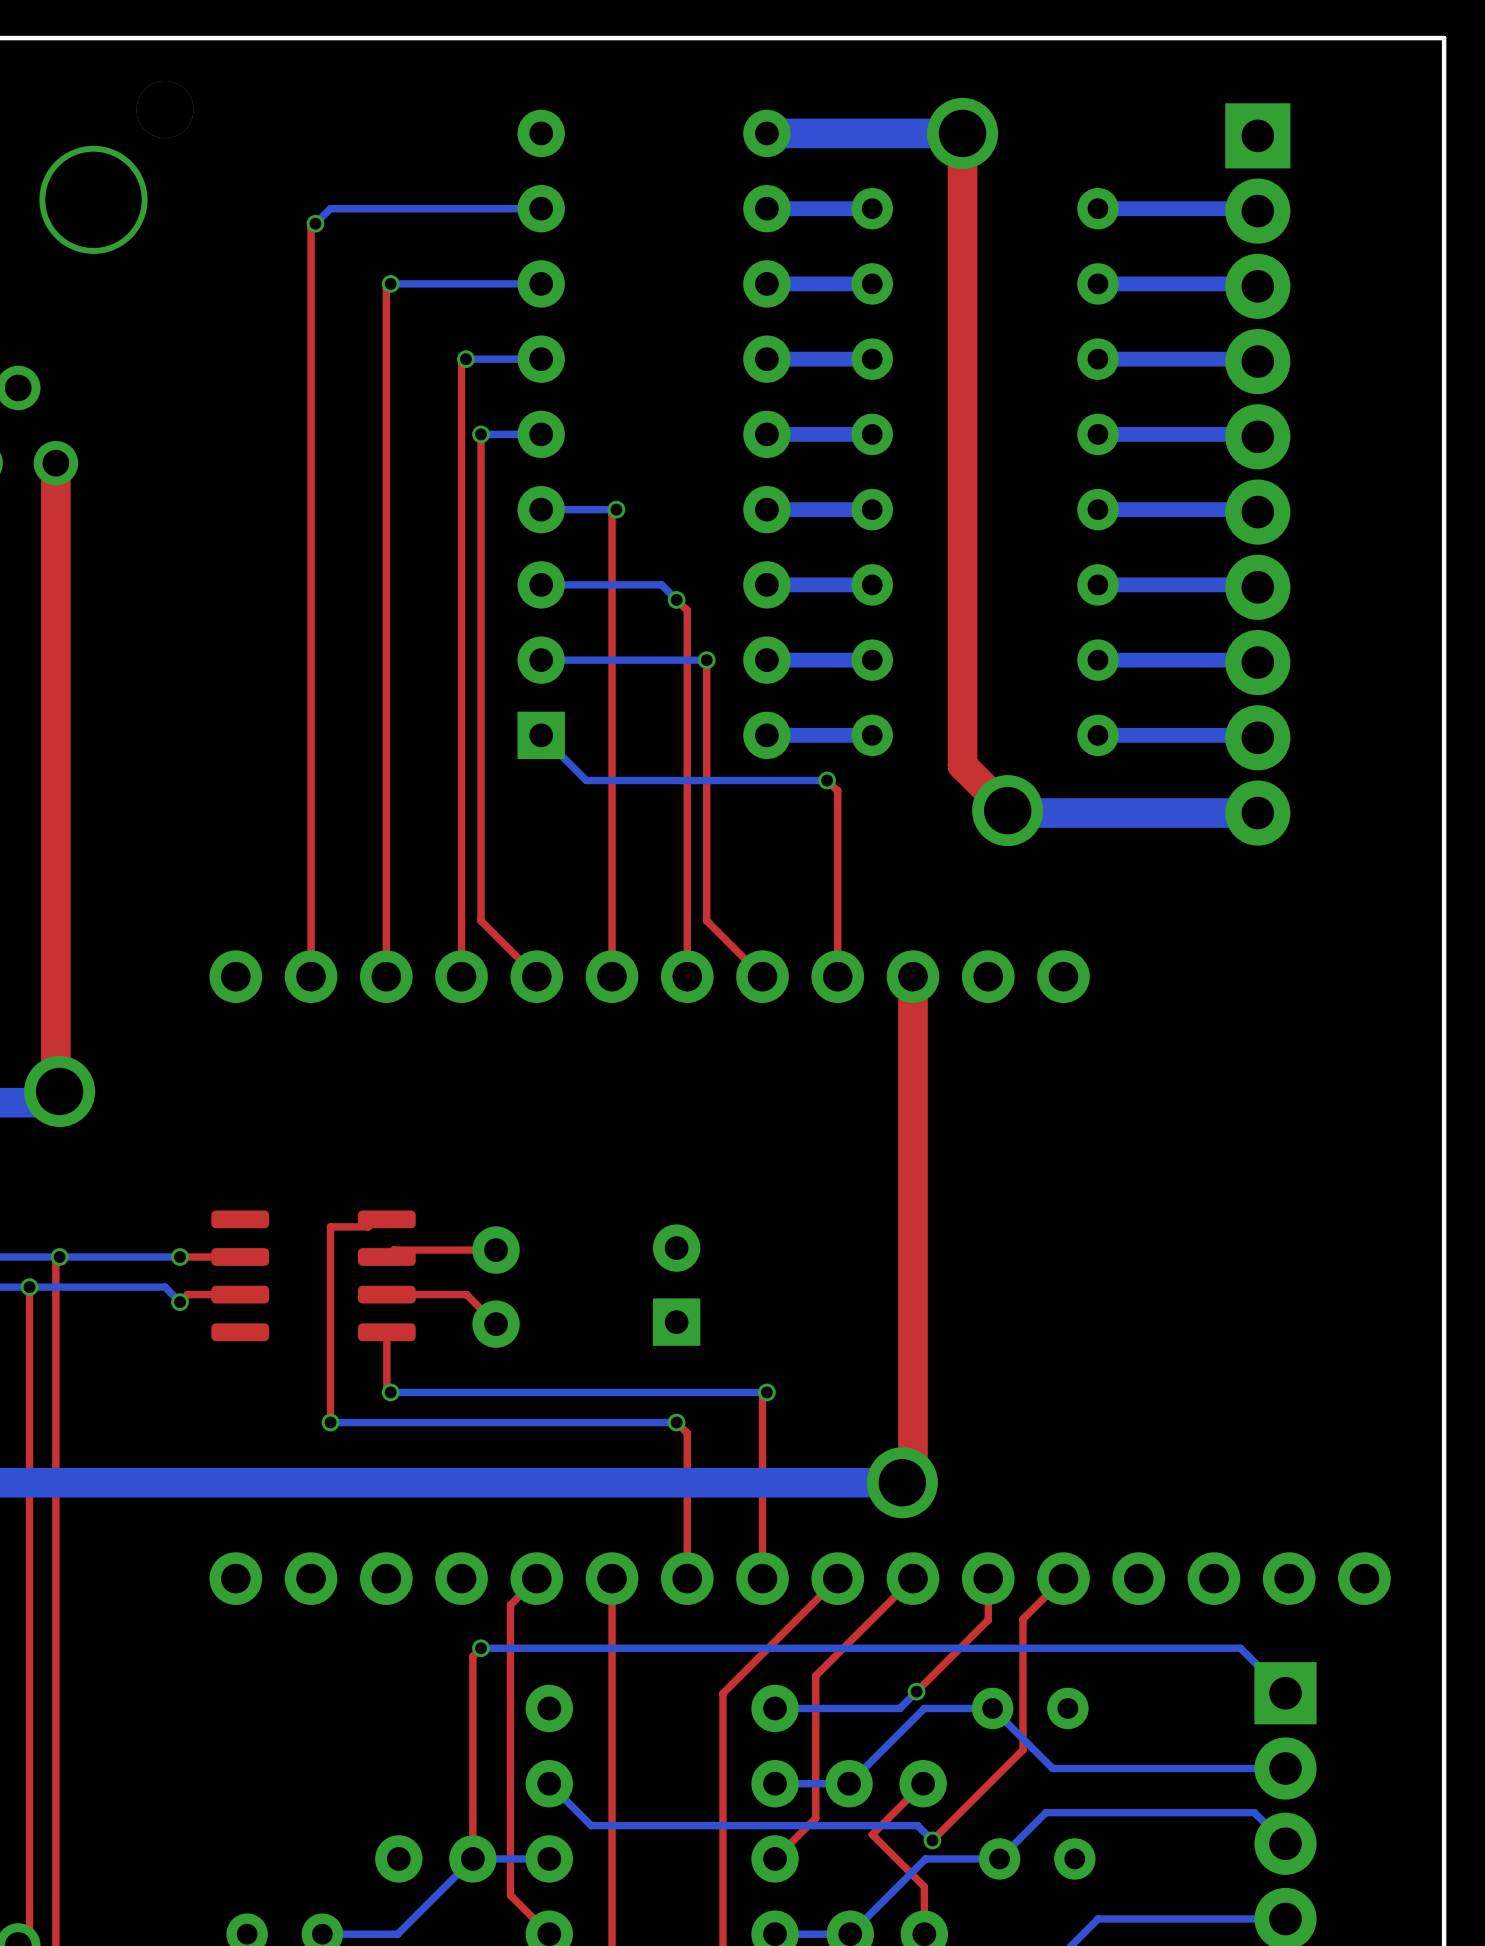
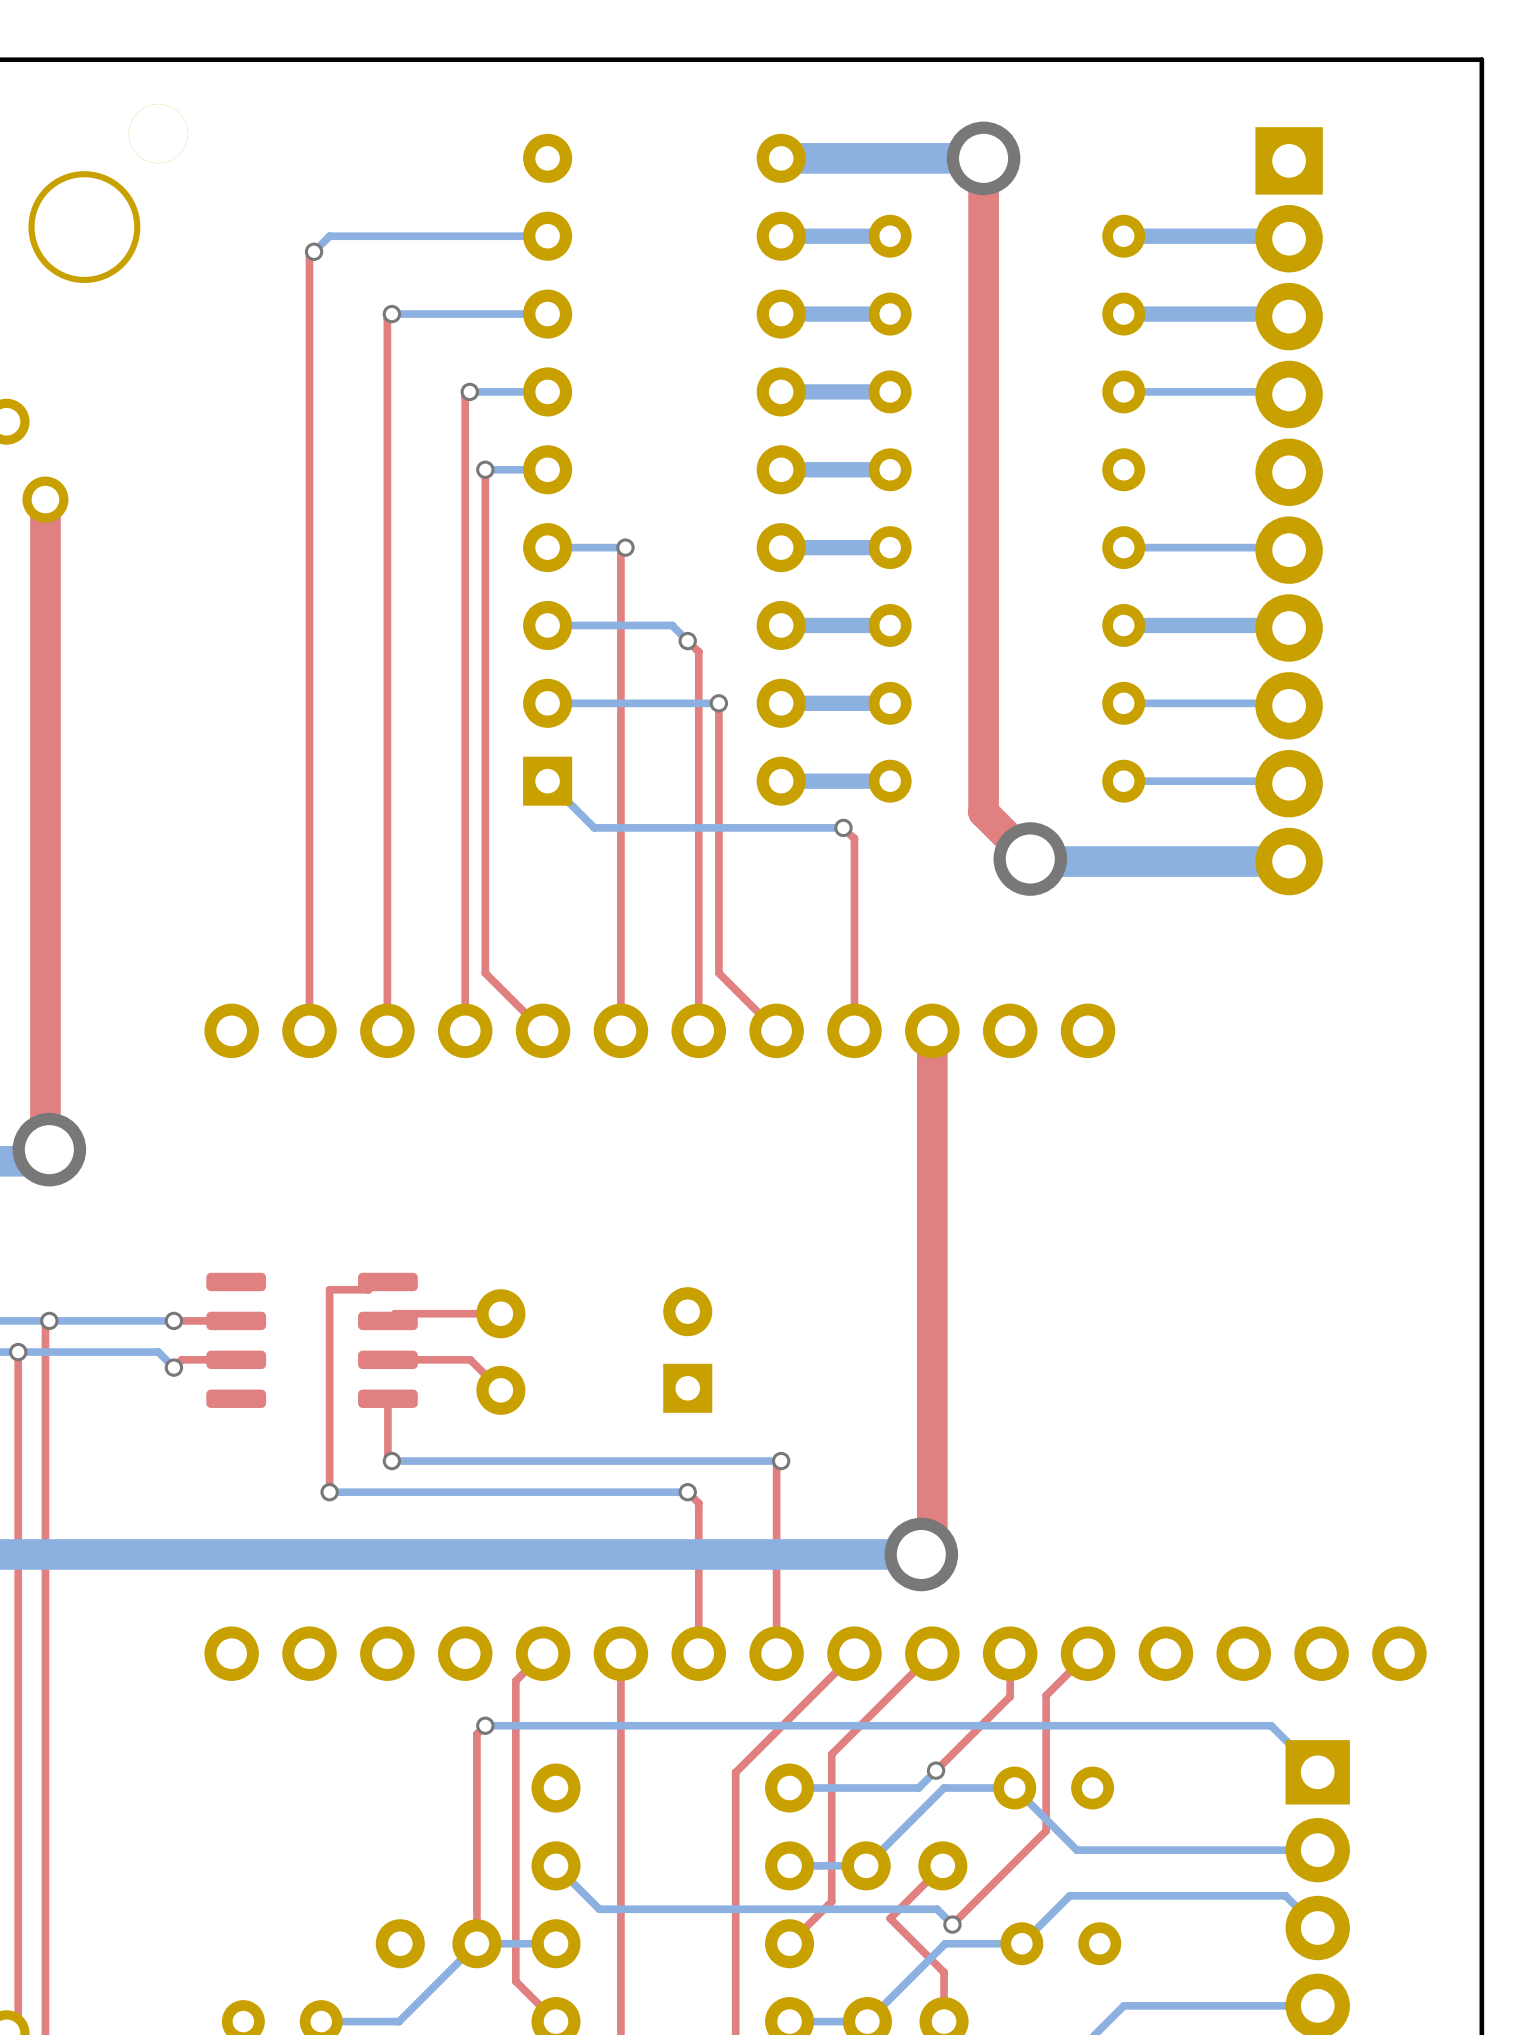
bottom track width: thick (1097, 359) (1255, 359) (1257, 361) -> thin (1123, 391) (1286, 391) (1289, 394)
bottom track: (1097, 434) (1255, 434) (1257, 436) -> none
bottom track width: thick (1097, 509) (1255, 509) (1257, 512) -> thin (1123, 547) (1286, 547) (1289, 550)
bottom track width: thick (1097, 660) (1255, 660) (1257, 662) -> thin (1123, 703) (1286, 703) (1289, 705)
bottom track width: thick (1097, 735) (1255, 735) (1257, 737) -> thin (1123, 781) (1286, 781) (1289, 783)

